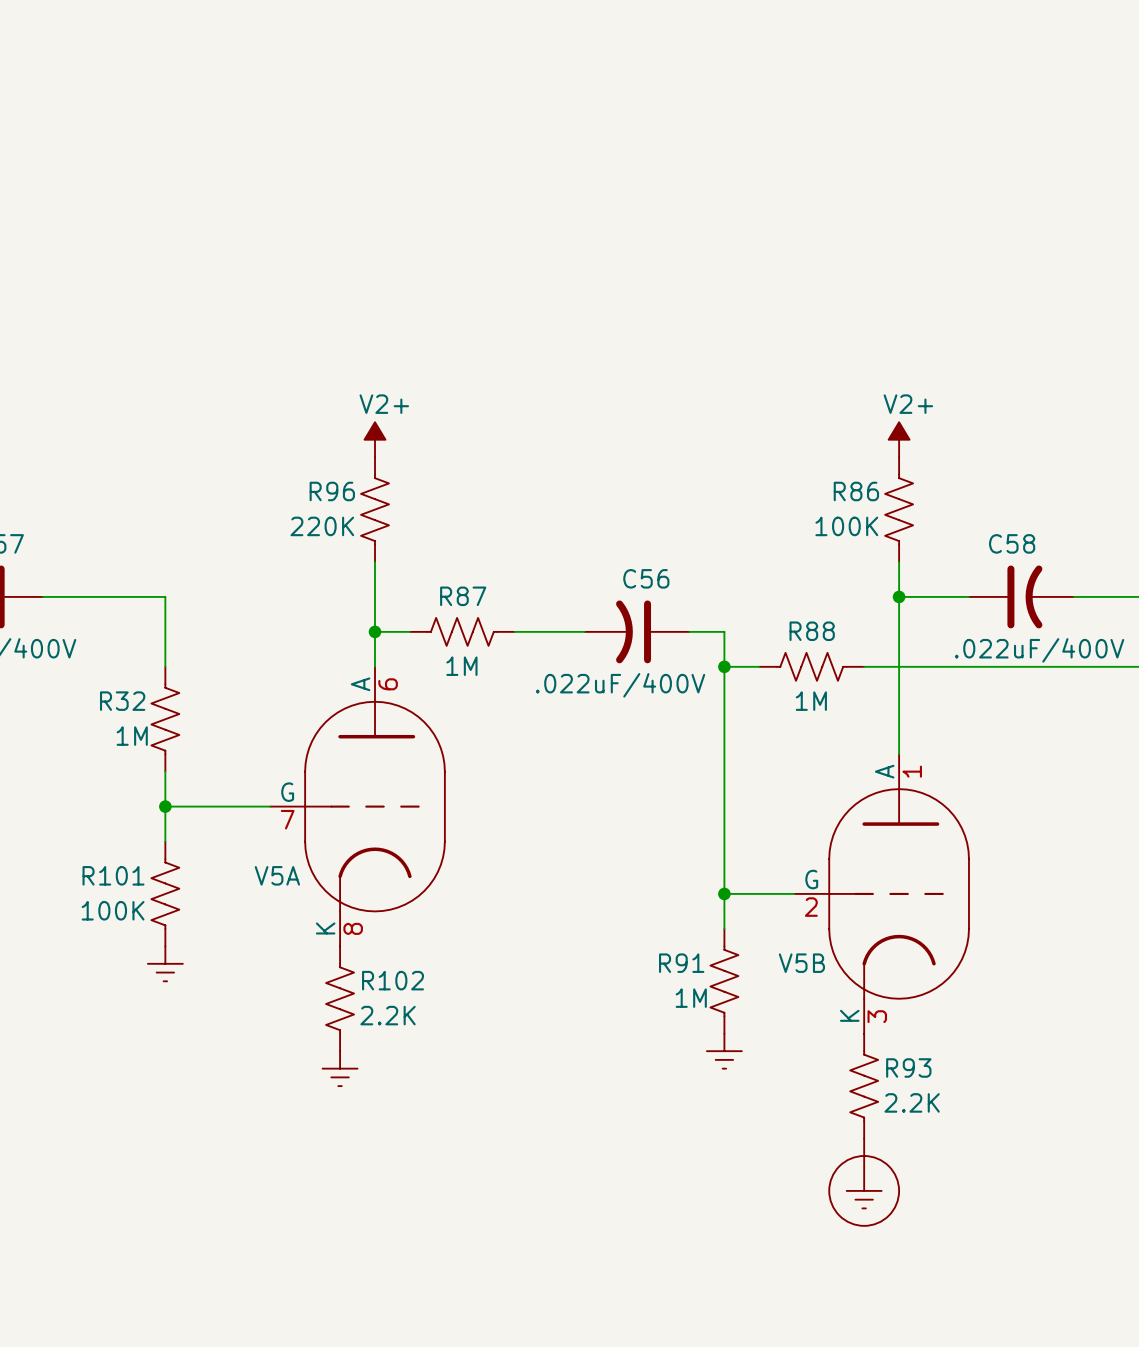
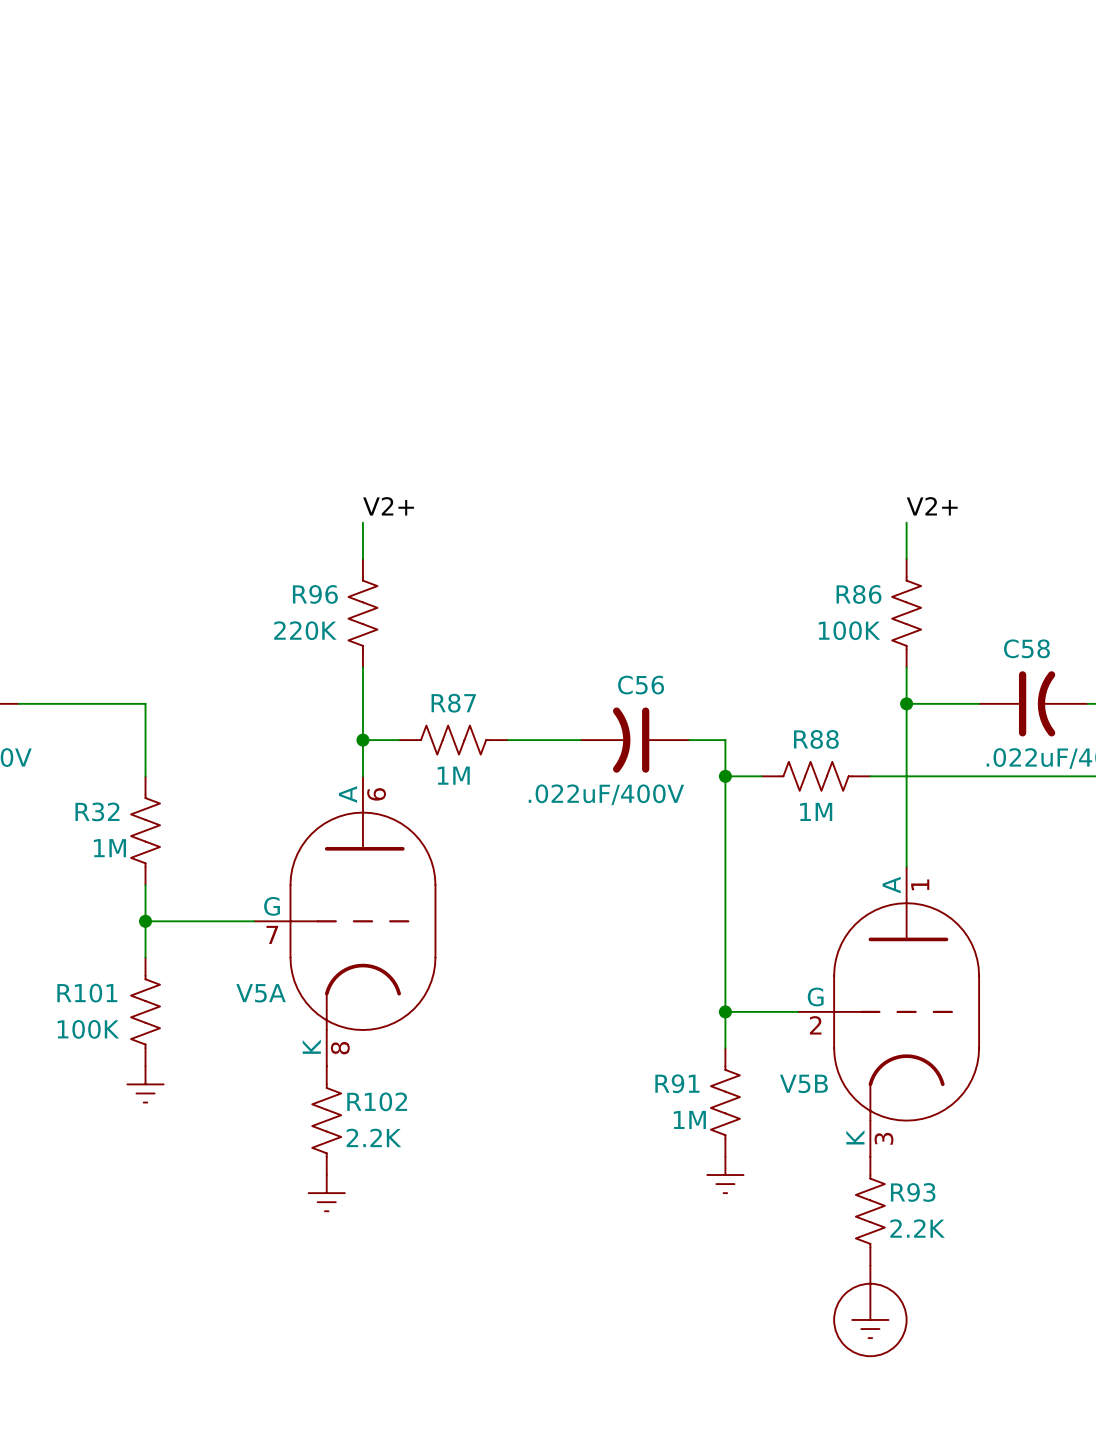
label: none -> V2+ (388, 506)
label: none -> V2+ (932, 506)
part: V2+ (375, 439) -> none
part: V2+ (899, 439) -> none

